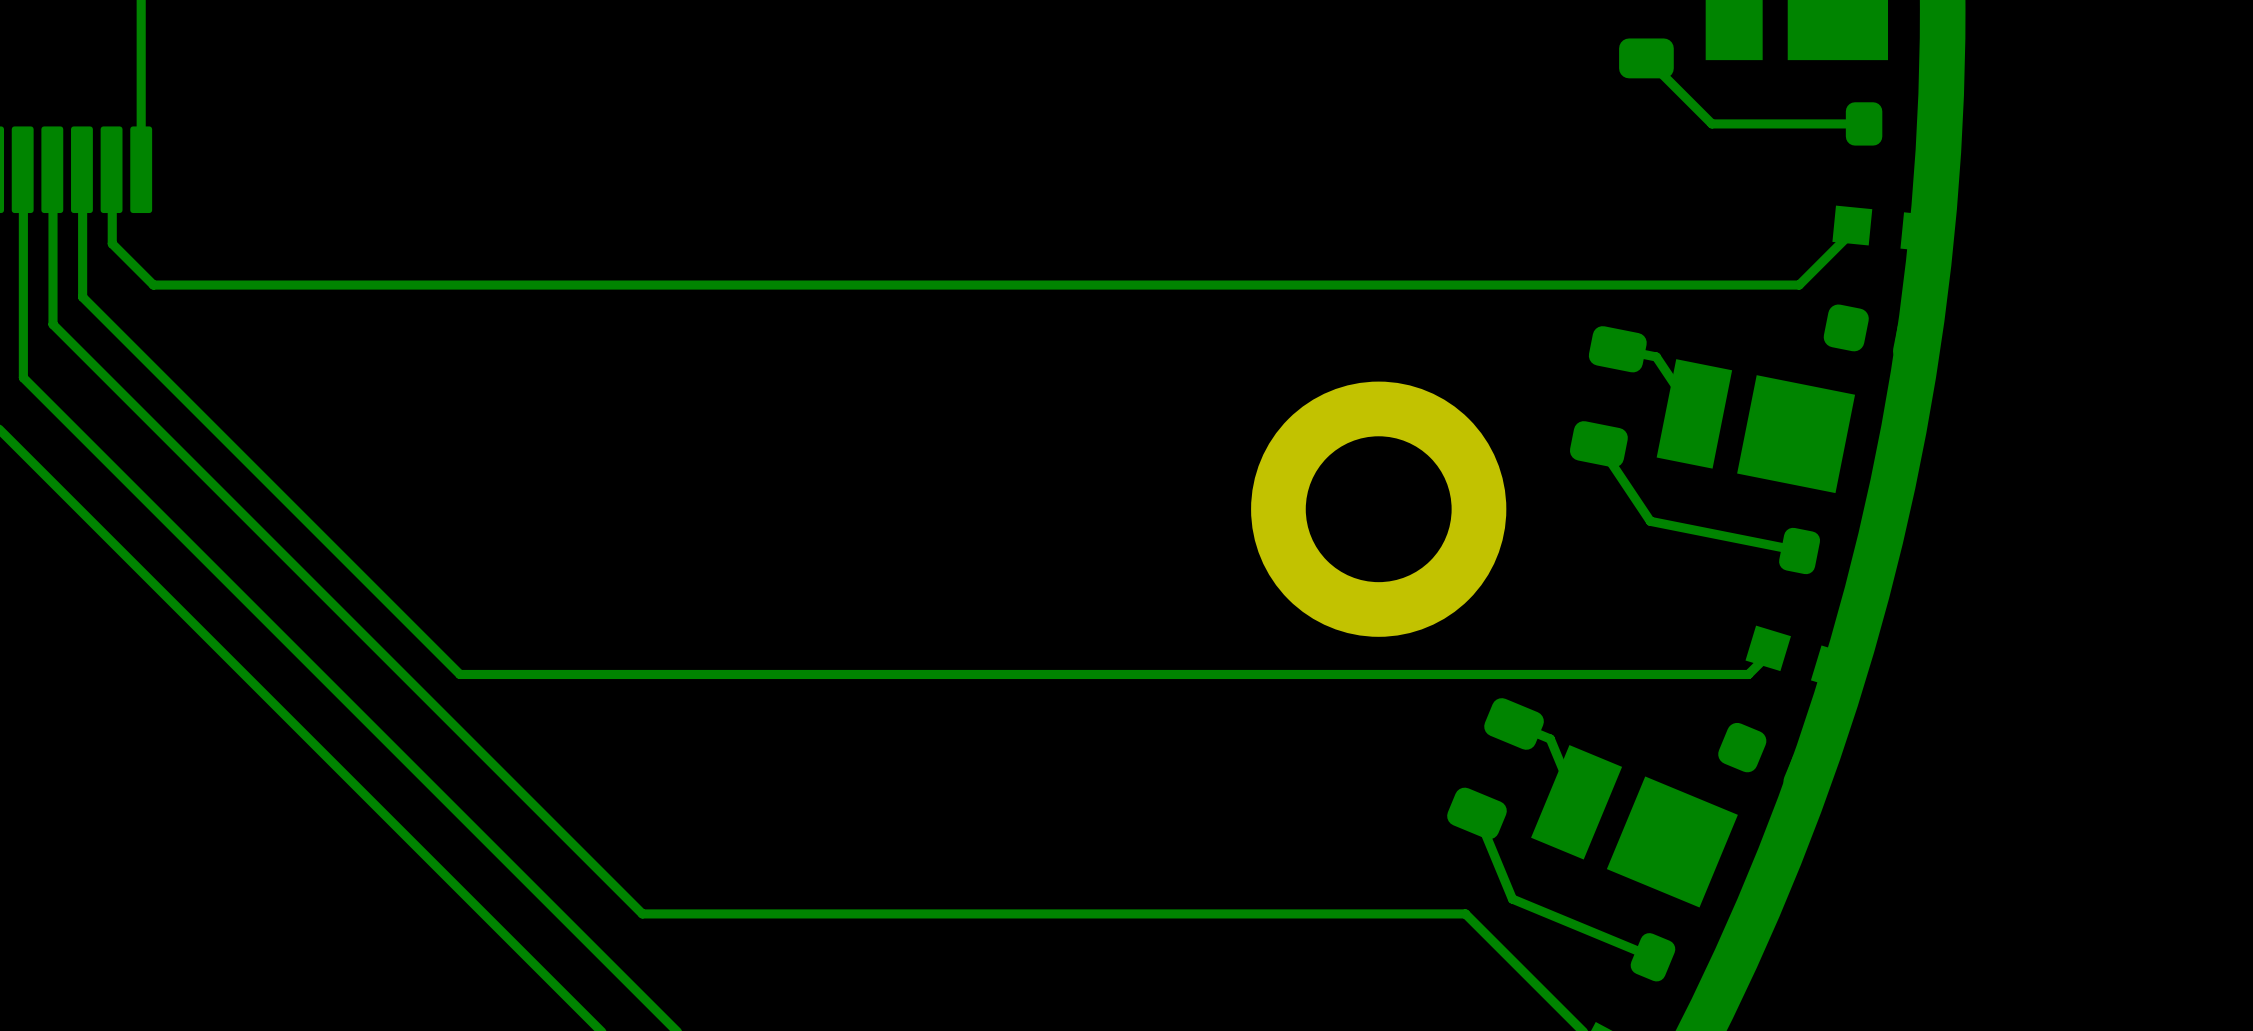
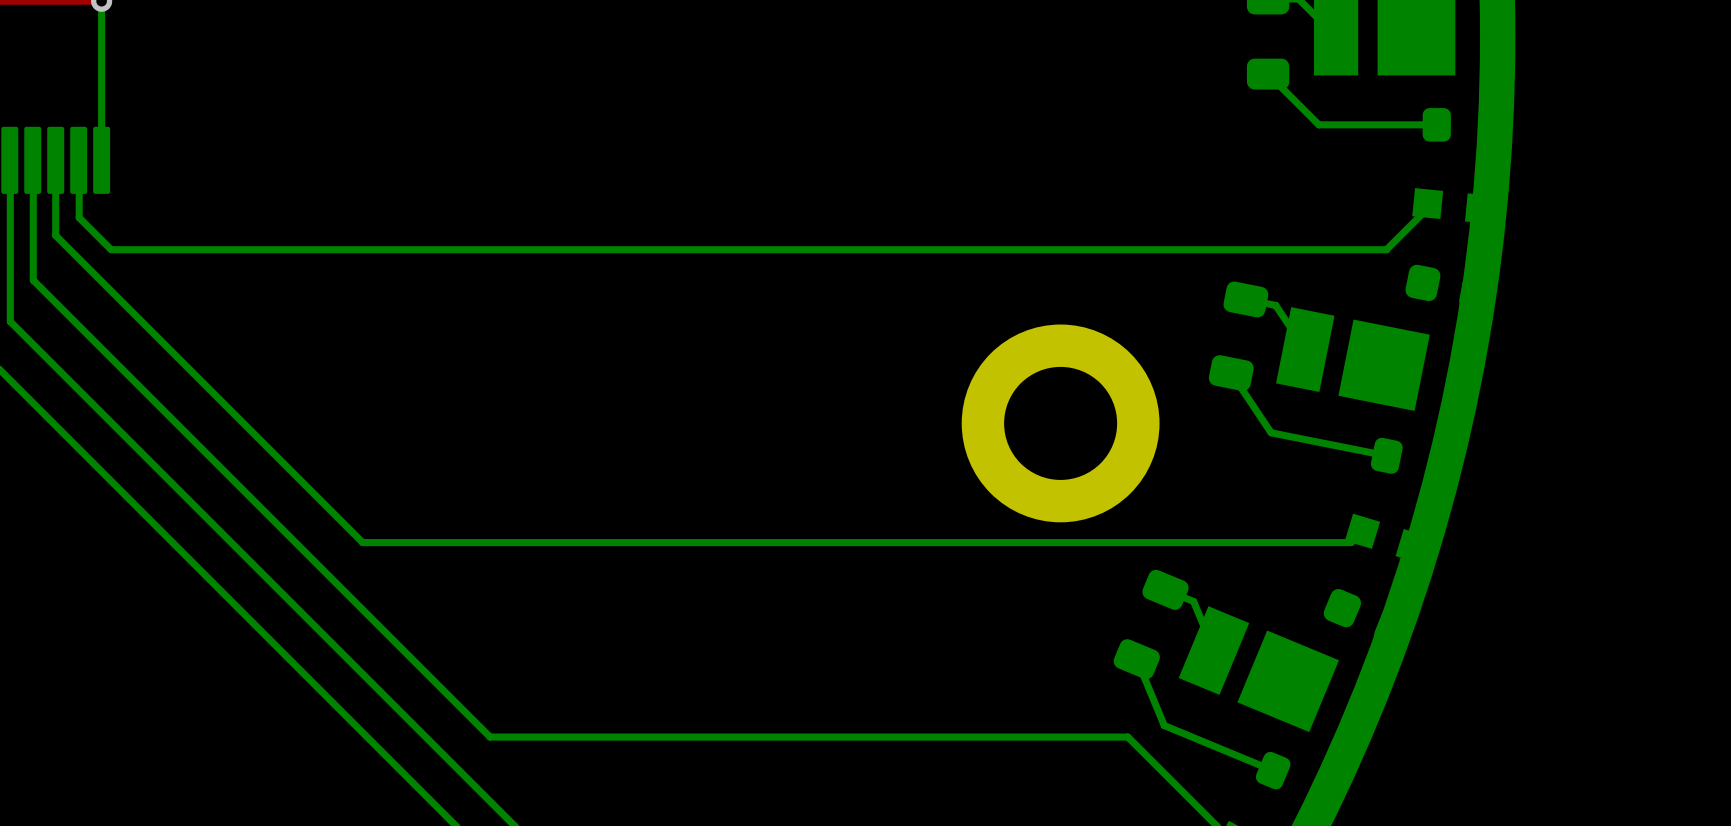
bottom track: none -> (55, 160) (55, 235) (362, 542) (1351, 542) (1362, 531)
bottom track: (82, 175) (82, 297) (459, 674) (1748, 674) (1768, 654) -> none

